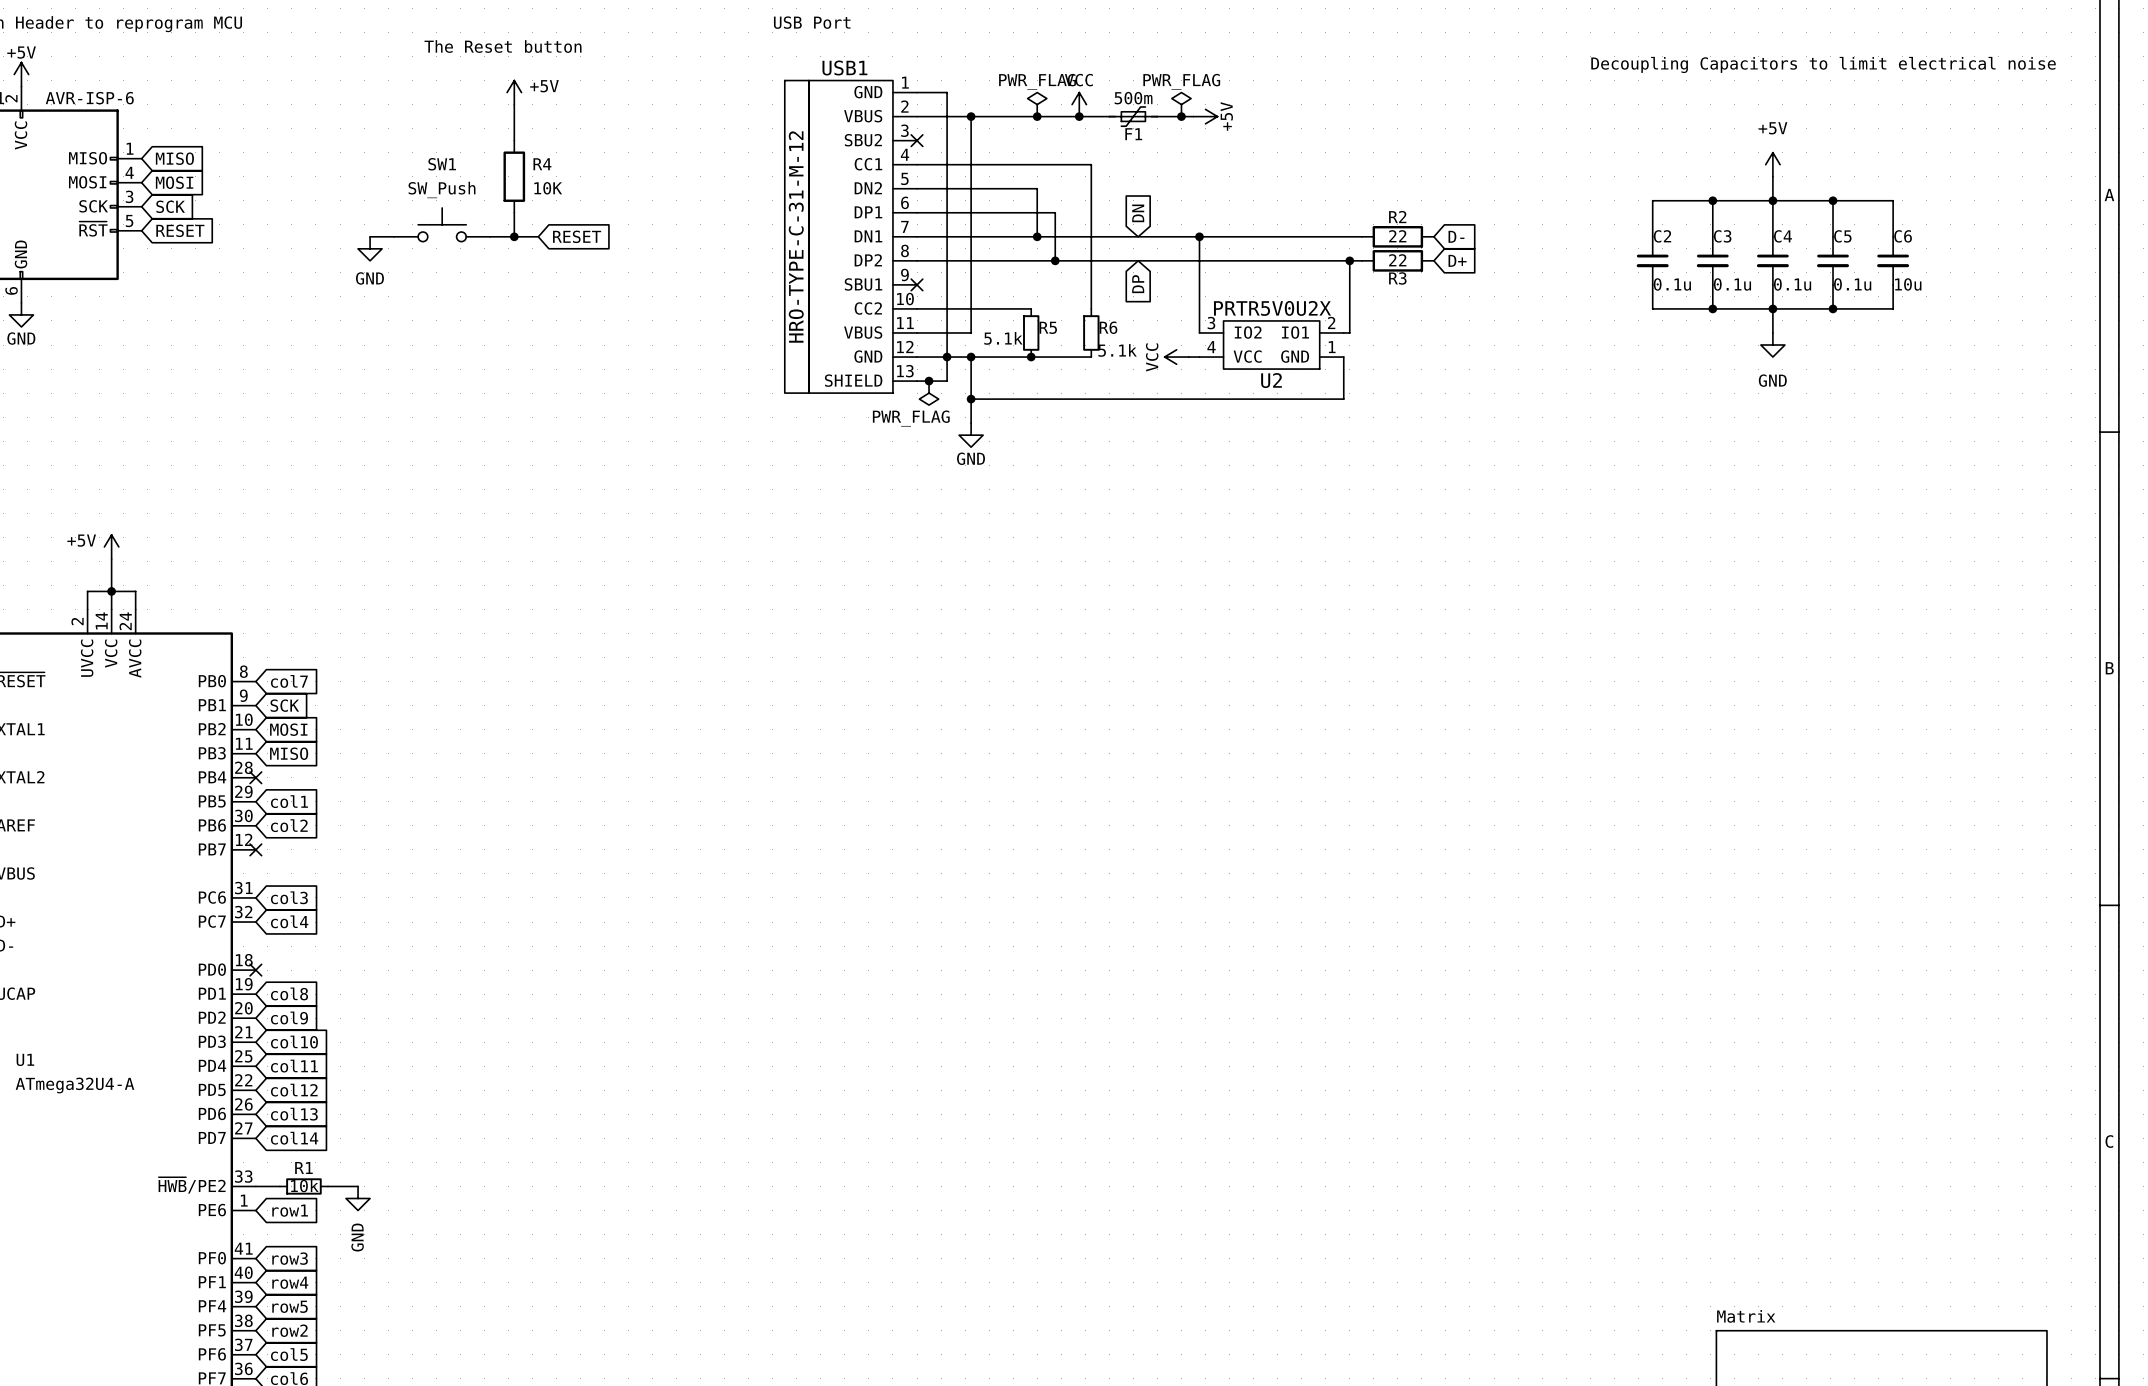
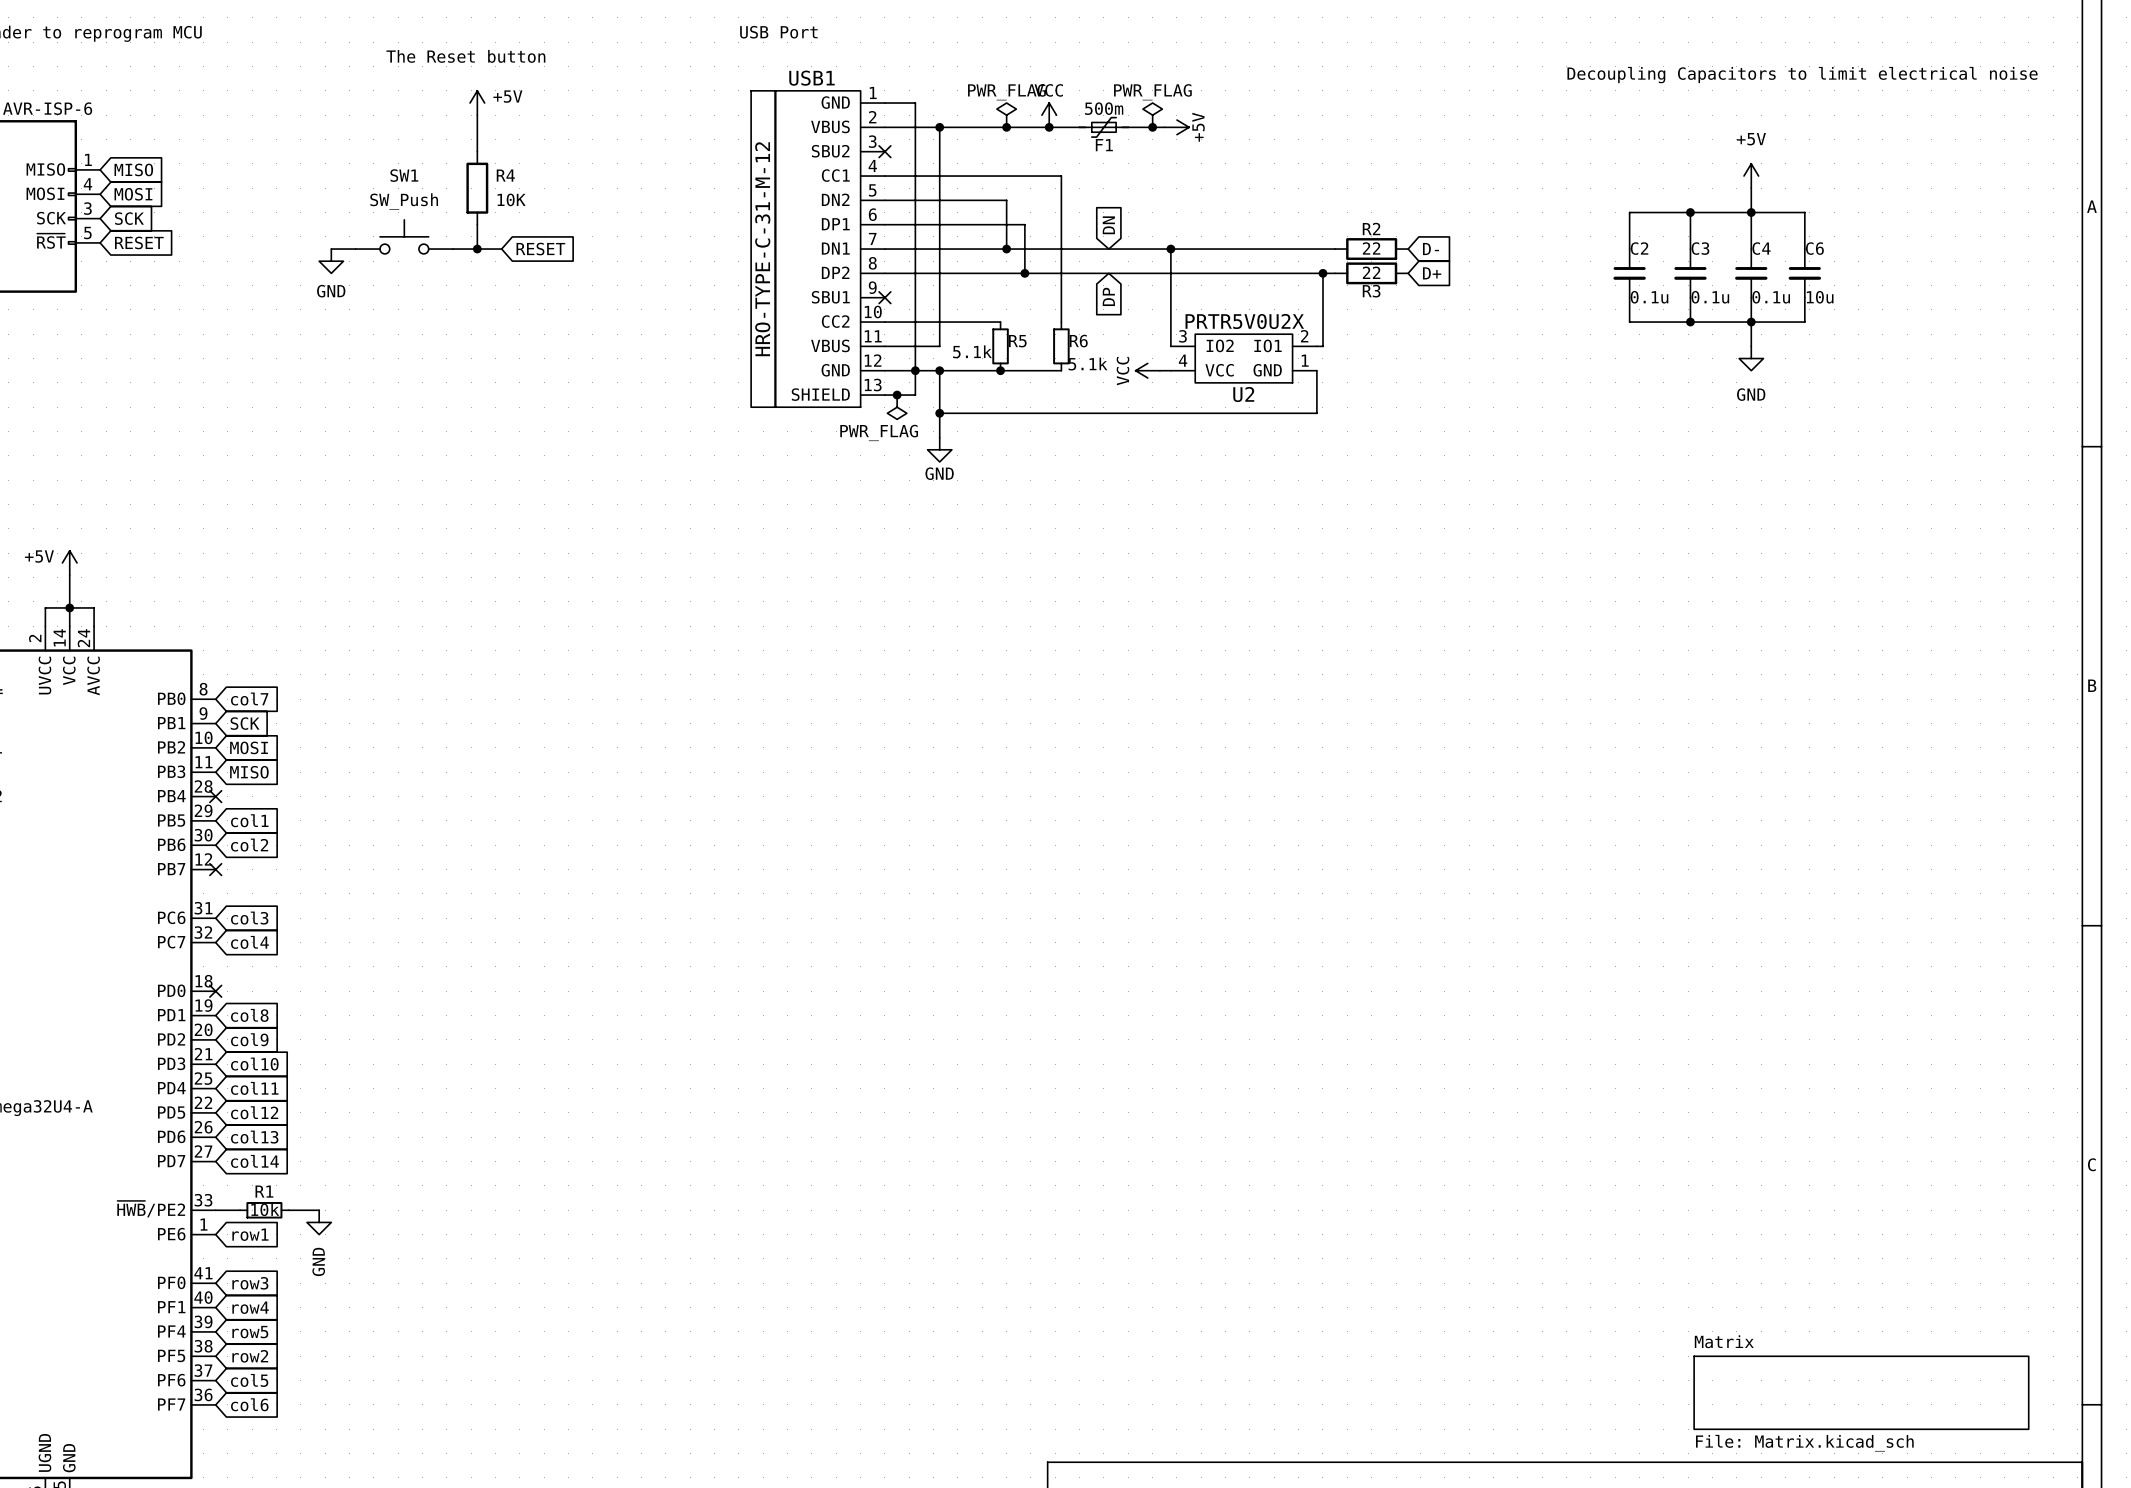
wire: (1825, 200) (1893, 200) (1893, 236) -> (1804, 212) (1804, 249)
wire: (1833, 200) (1833, 236) -> none
junction: (1833, 200) -> none
C5: 0.1u (1833, 260) -> none
C6 position: (1893, 260) -> (1804, 273)
wire: (1833, 284) (1833, 308) -> none
wire: (1893, 284) (1893, 308) (1825, 308) -> (1804, 297) (1804, 322)
junction: (1833, 308) -> none

